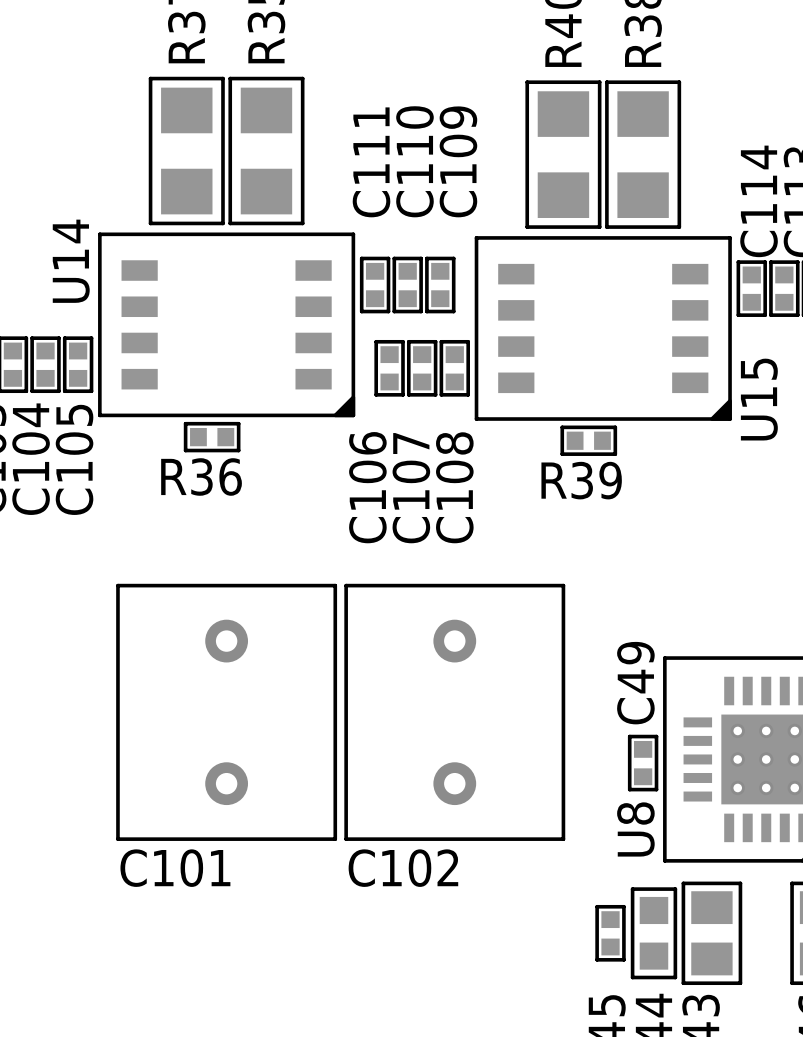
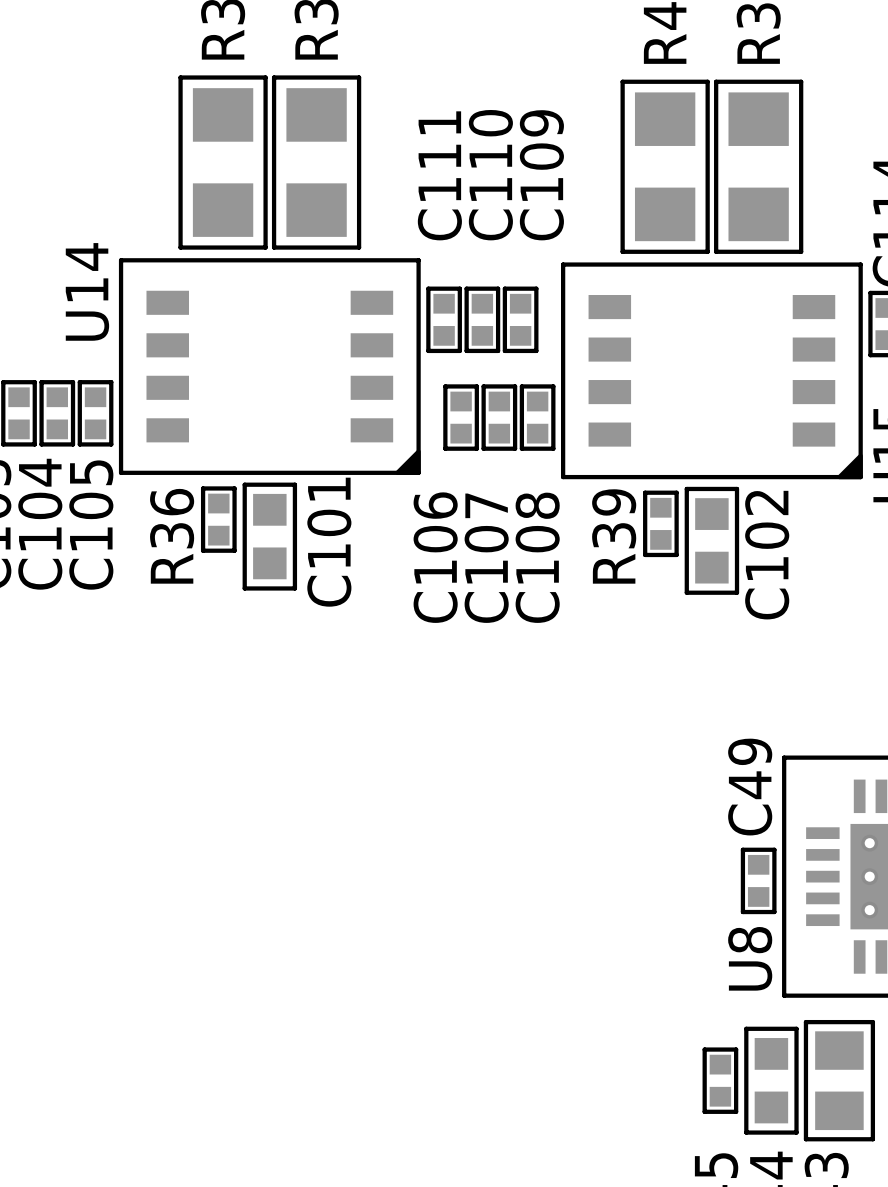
R36 rotation: 0° (212, 437) -> 90° clockwise (218, 519)
R36 position: (212, 437) -> (218, 519)
R39 rotation: 0° (588, 440) -> 90° clockwise (660, 523)
R39 position: (588, 440) -> (660, 523)
C101 footprint: [116, 583, 338, 841] -> [242, 482, 298, 591]
C102 footprint: [344, 583, 566, 841] -> [684, 486, 740, 595]
C101 name position: C101 (175, 868) -> C101 (329, 542)
C102 name position: C102 (403, 868) -> C102 (767, 555)

